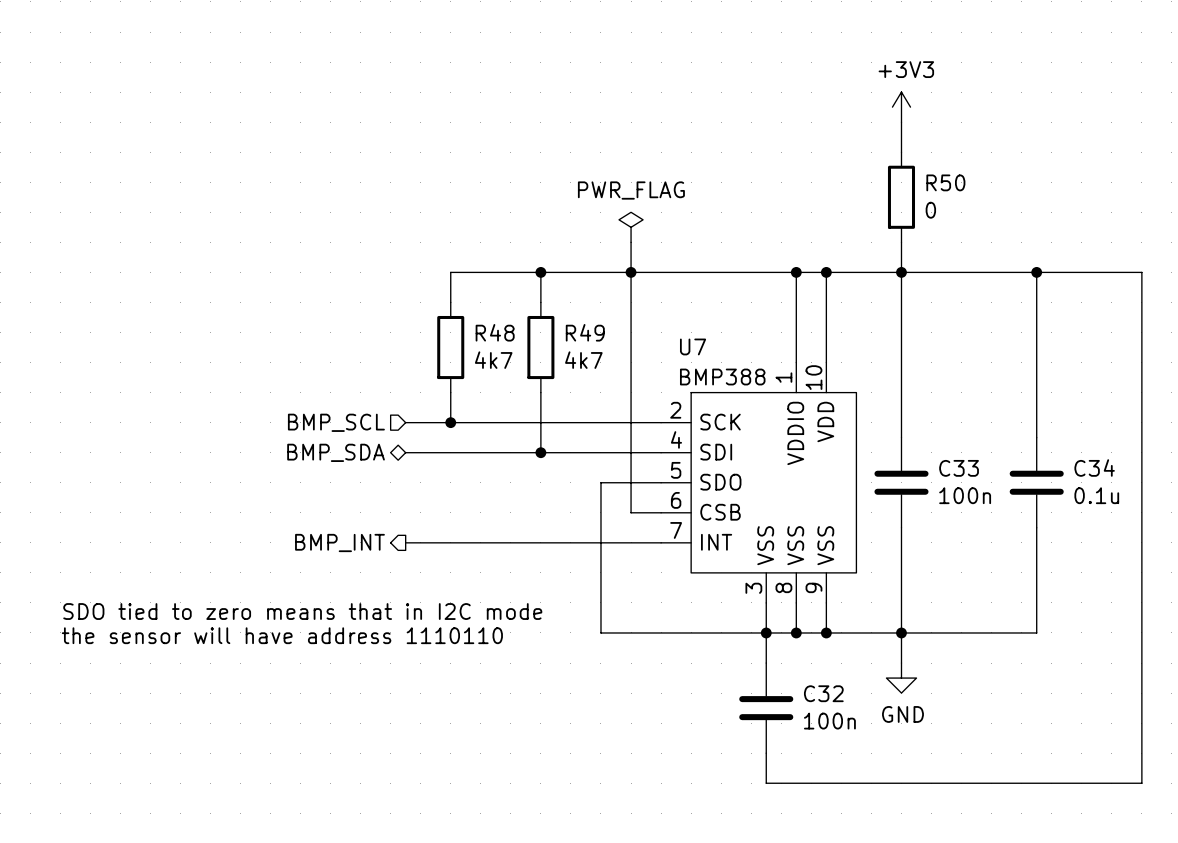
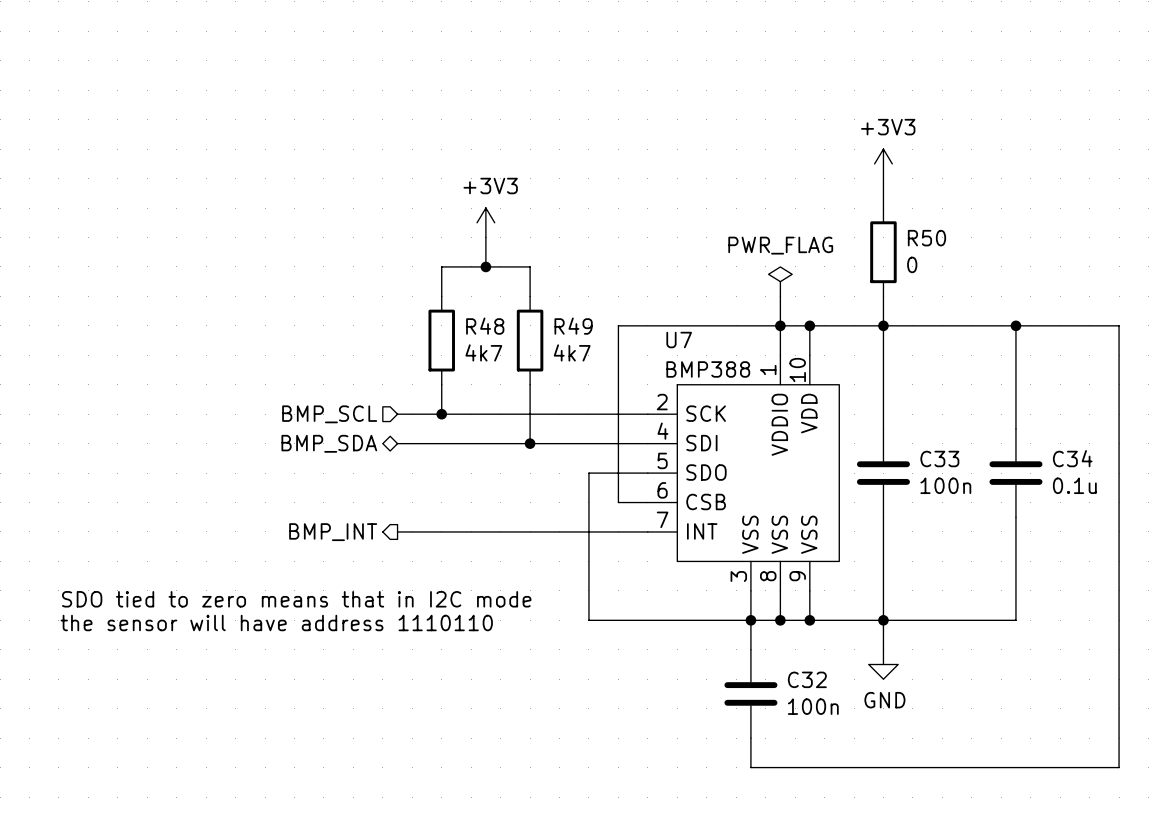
power symbol position: +3V3 (901, 107) -> +3V3 (883, 163)
wire: (901, 122) (901, 152) -> (883, 178) (883, 208)
R50 position: (901, 197) -> (883, 252)
power symbol: none -> +3V3 (485, 222)
power symbol position: PWR_FLAG (631, 227) -> PWR_FLAG (780, 281)
wire: none -> (485, 237) (485, 266)
wire: (631, 242) (631, 332) -> none
wire: (901, 242) (901, 302) -> none
wire: (540, 272) (1141, 272) (1141, 332) -> (618, 325) (1119, 325)
junction position: (540, 272) -> (485, 266)
junction: (631, 272) -> none
junction: (796, 272) -> none
wire: (826, 272) (826, 332) -> none
junction: (826, 272) -> none
junction: (901, 272) -> none
wire: (1036, 272) (1036, 332) -> none
junction position: (1036, 272) -> (1015, 325)
junction: none -> (780, 325)
junction: none -> (809, 325)
junction: none -> (883, 325)

